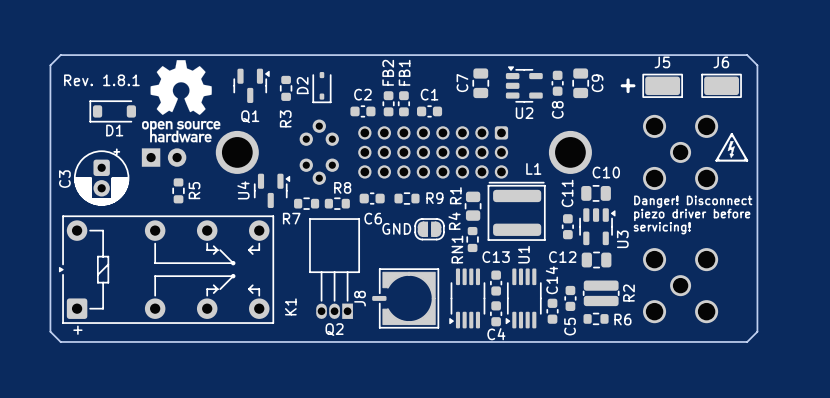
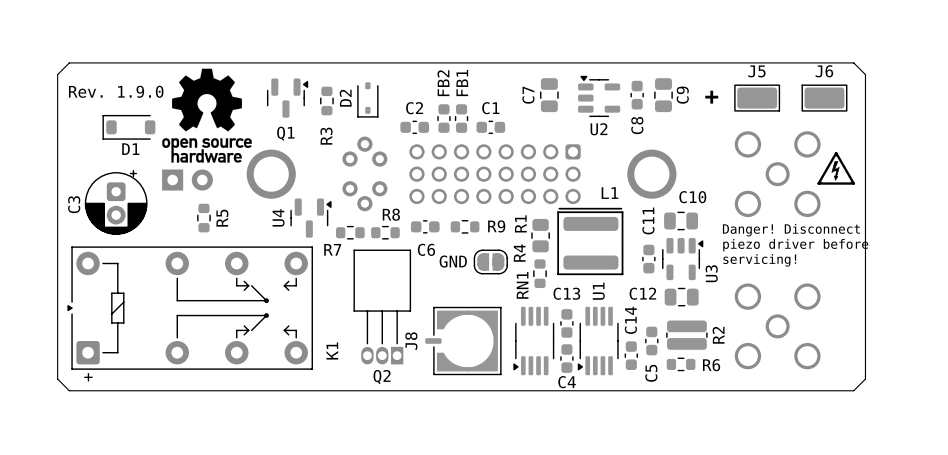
text: Rev. 1.8.1 (101, 80) -> Rev. 1.9.0 (116, 91)

